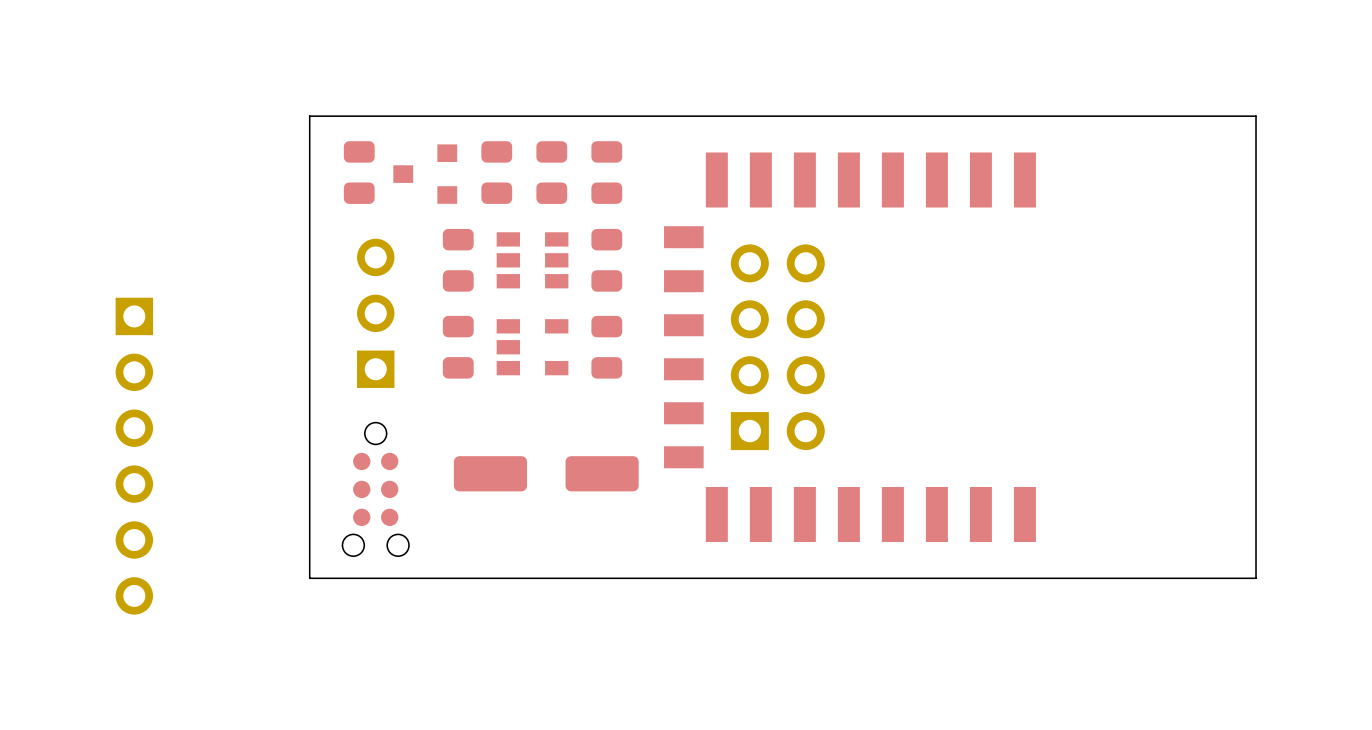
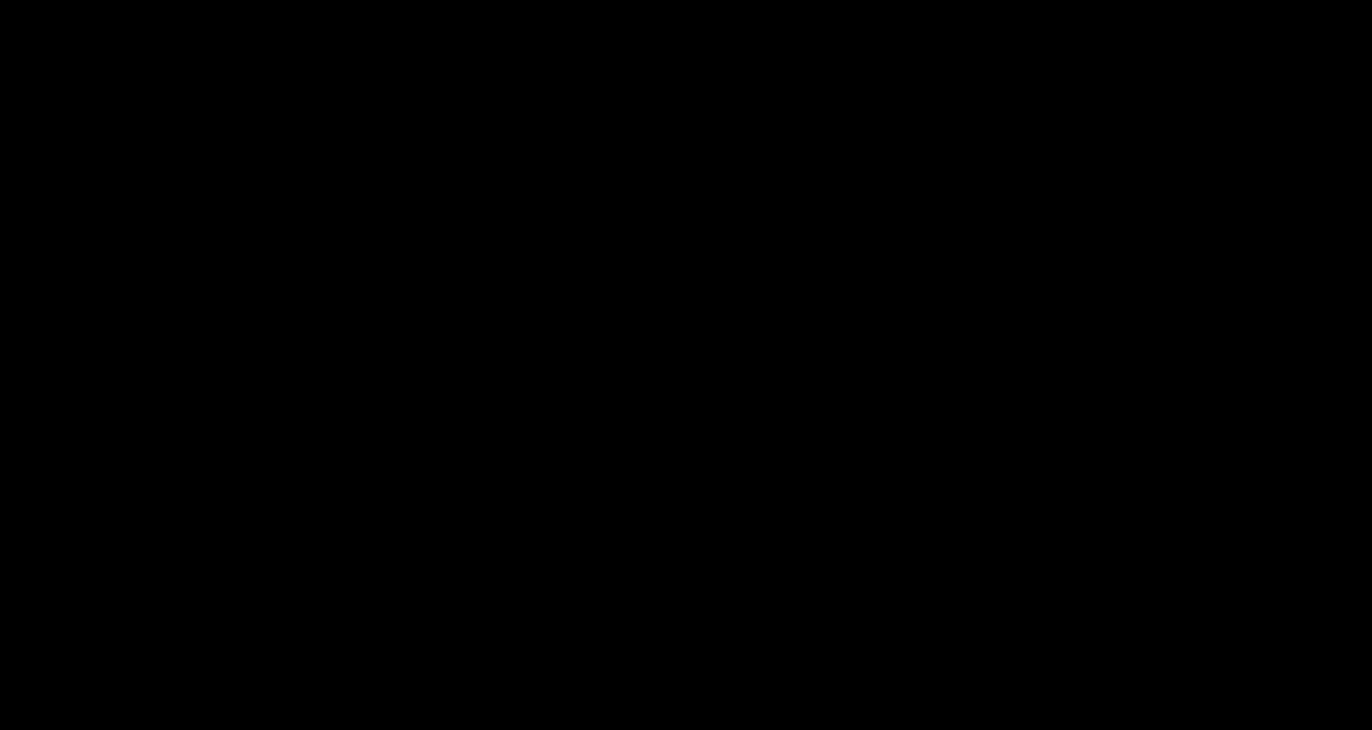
board edge: (1256, 116) (1256, 578) (309, 578) (309, 116) (1256, 116) -> none
part: (359, 172) -> none
part: (496, 172) -> none
part: (551, 172) -> none
part: (606, 172) -> none
part: (425, 174) -> none
part: (458, 260) -> none
part: (532, 260) -> none
part: (606, 260) -> none
part: (375, 313) -> none
part: (458, 347) -> none
part: (532, 347) -> none
part: (606, 347) -> none
part: (777, 347) -> none
part: (849, 347) -> none
part: (134, 456) -> none
part: (546, 473) -> none
part: (375, 489) -> none

